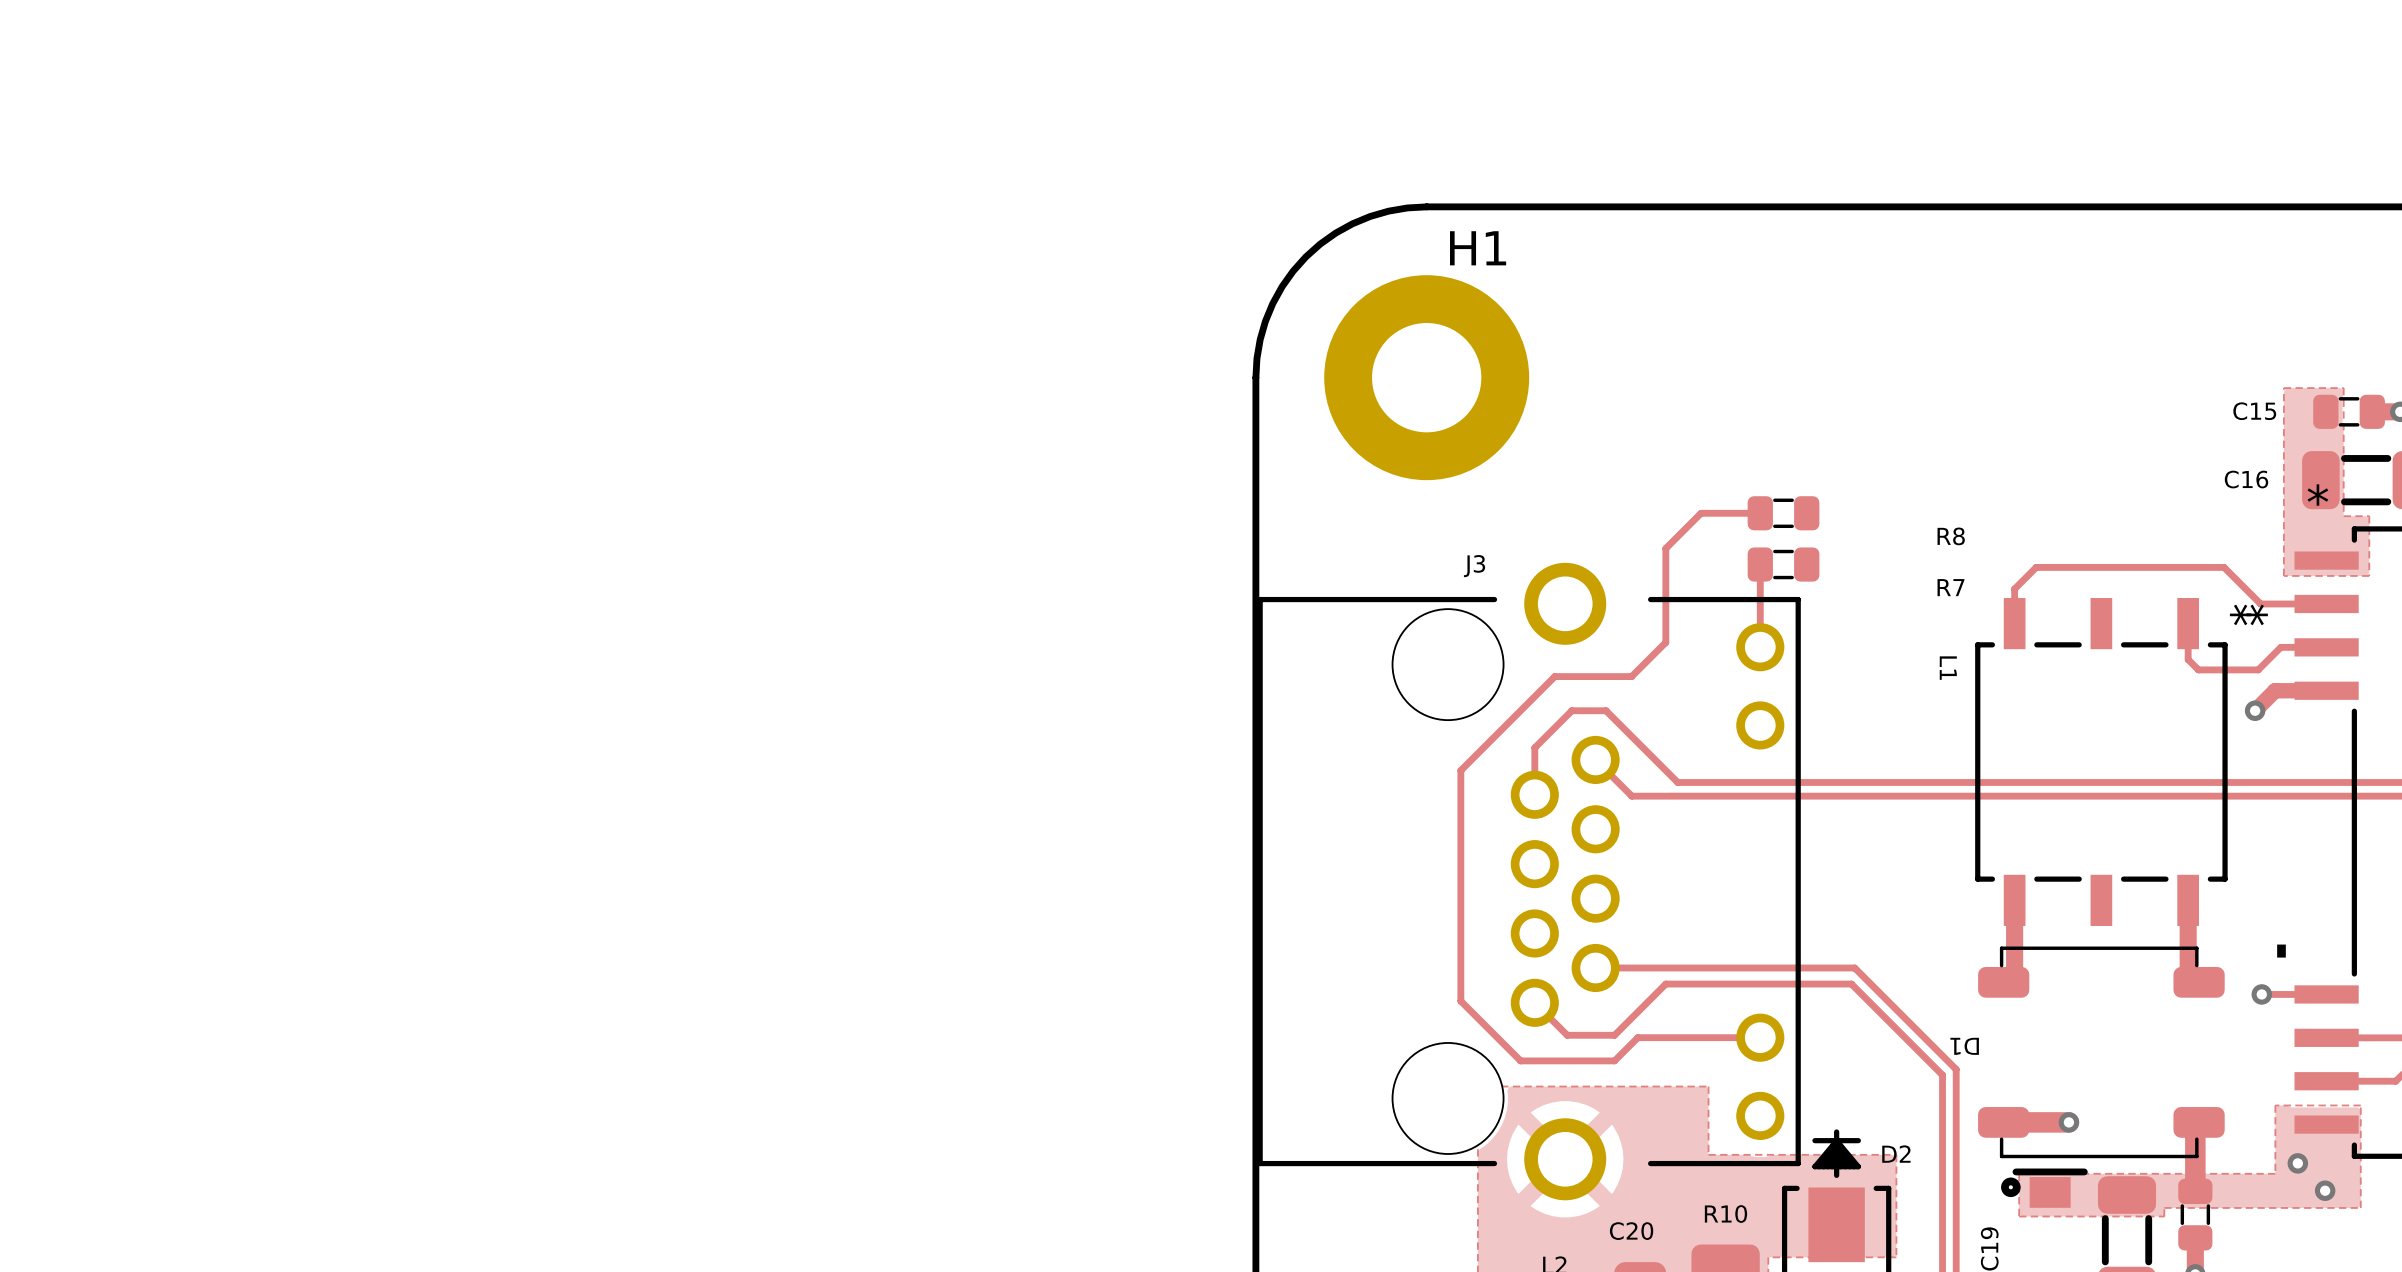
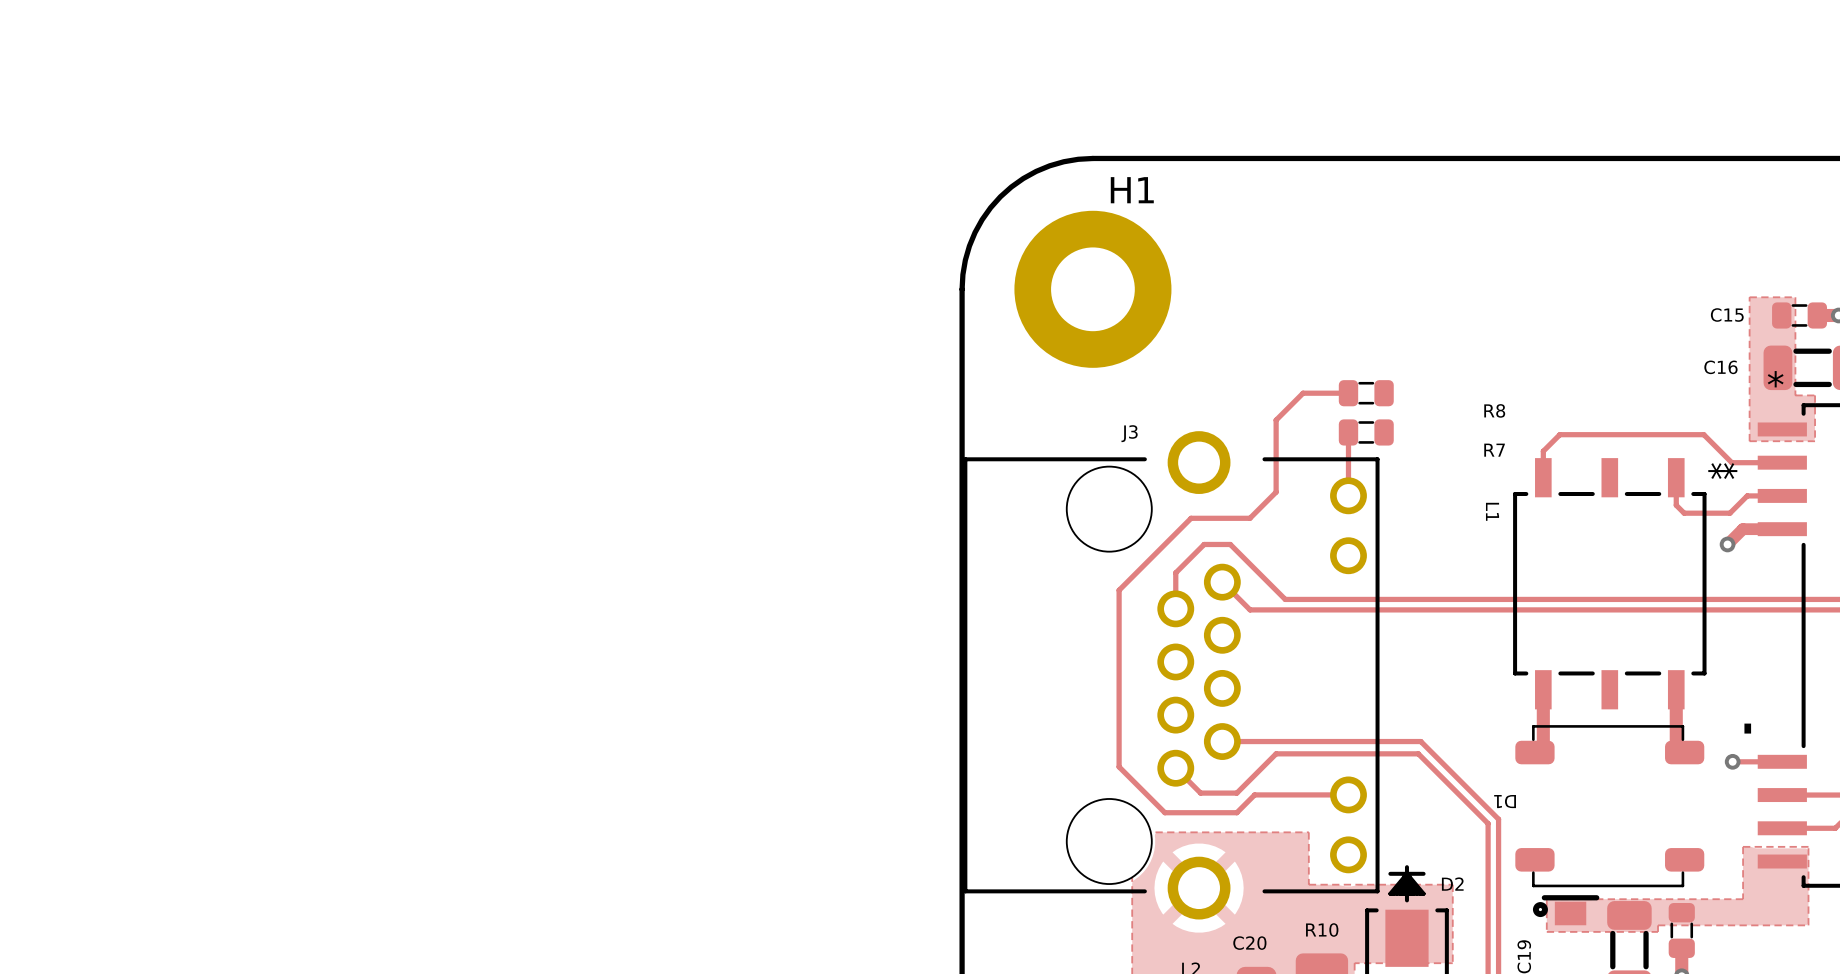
track: (2003, 1122) (2068, 1122) -> none
via: (2068, 1122) -> none
track: (2199, 1122) (2195, 1126) (2195, 1191) -> none
via: (2297, 1163) -> none
via: (2325, 1190) -> none

